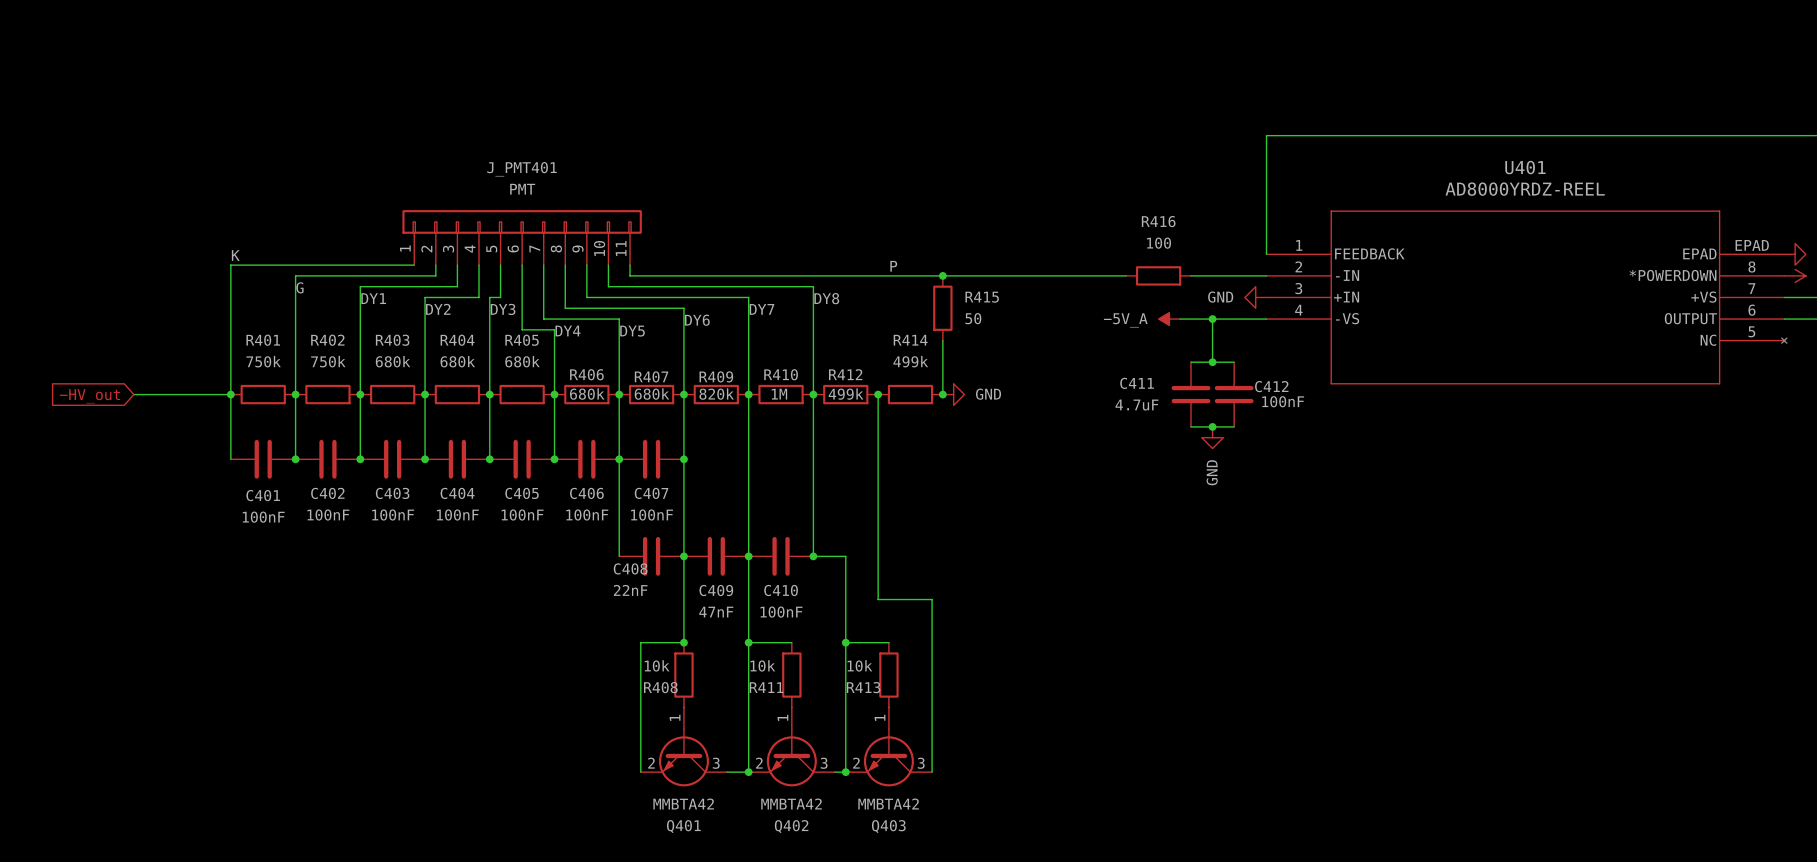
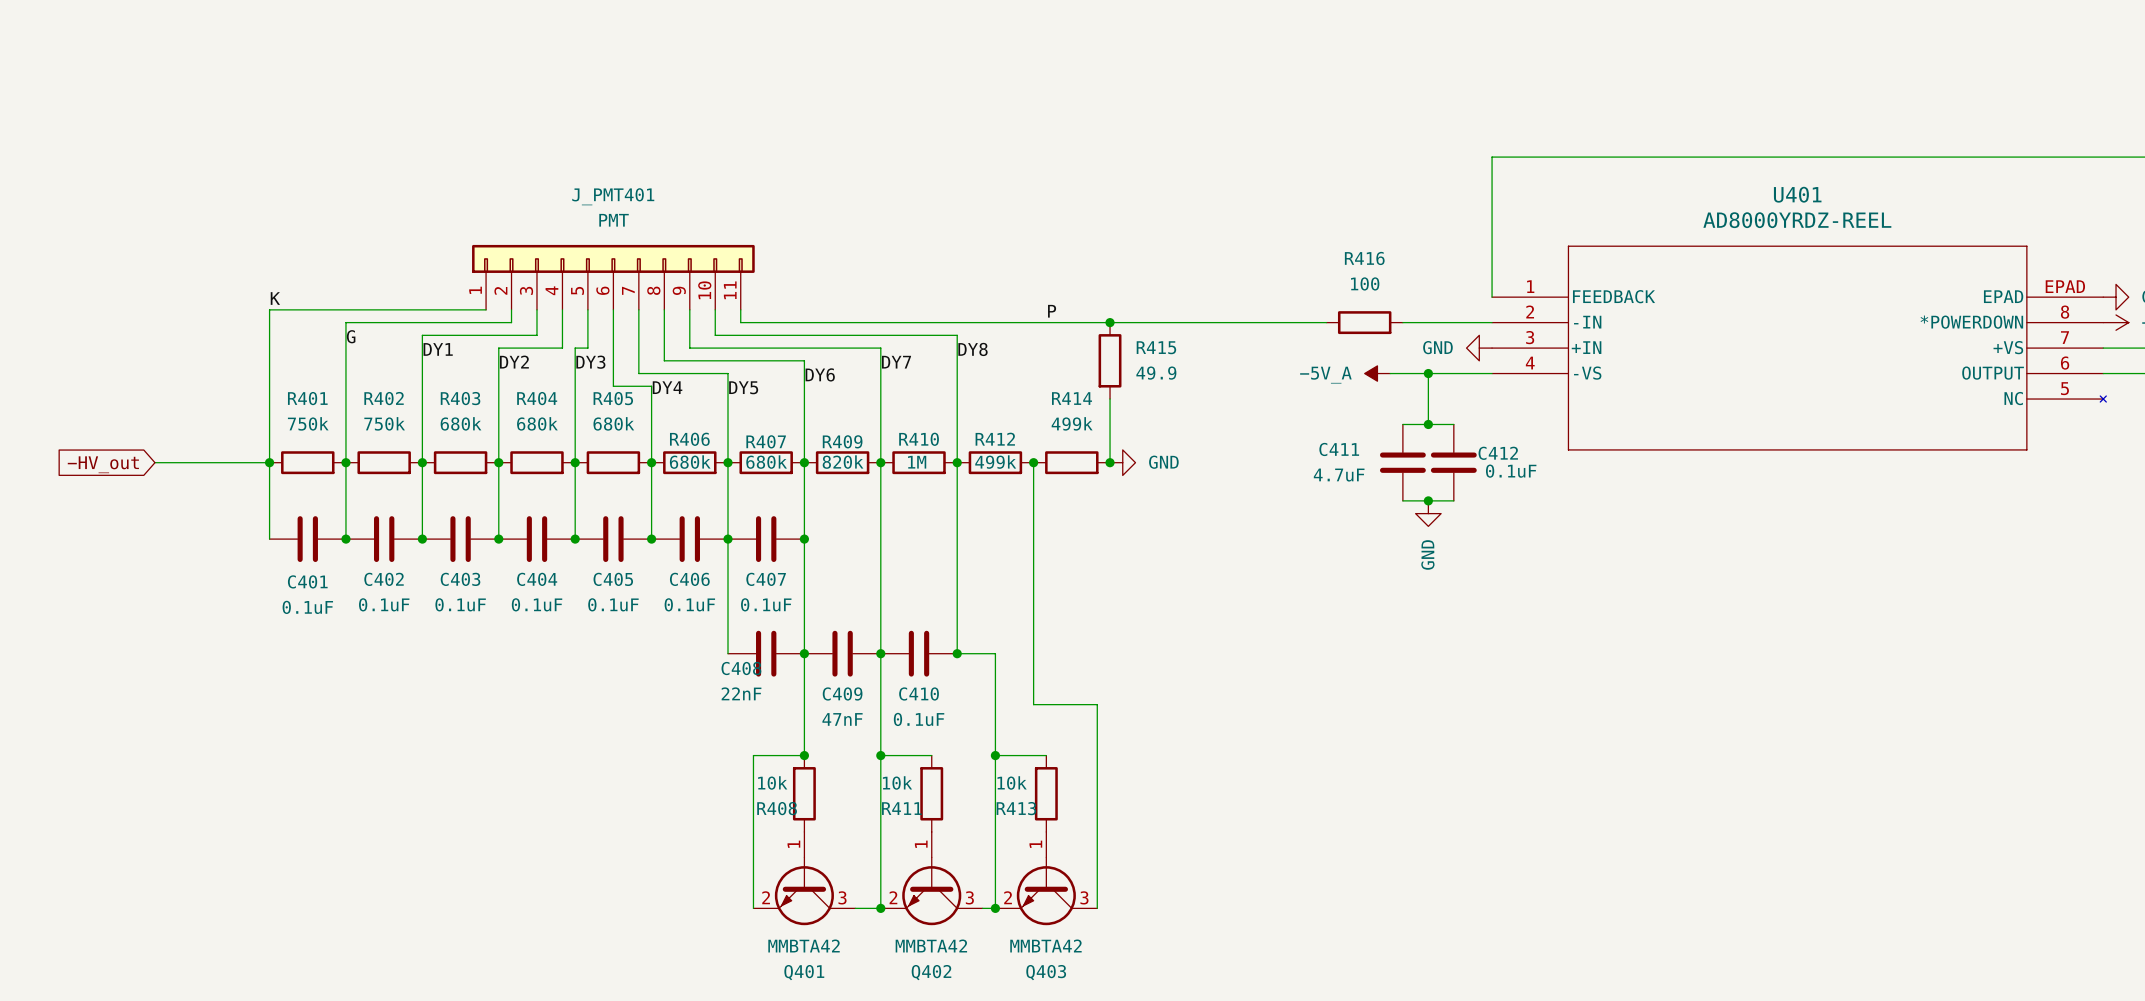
R415 value: 50 (973, 318) -> 49.9 (1156, 373)
C412 value: 100nF (1283, 401) -> 0.1uF (1511, 471)
C402 value: 100nF (328, 514) -> 0.1uF (384, 604)
C403 value: 100nF (393, 514) -> 0.1uF (460, 604)
C404 value: 100nF (457, 514) -> 0.1uF (537, 604)
C405 value: 100nF (522, 514) -> 0.1uF (613, 604)
C406 value: 100nF (587, 514) -> 0.1uF (689, 604)
C407 value: 100nF (652, 514) -> 0.1uF (766, 604)
C401 value: 100nF (263, 517) -> 0.1uF (307, 607)
C410 value: 100nF (781, 612) -> 0.1uF (919, 719)

